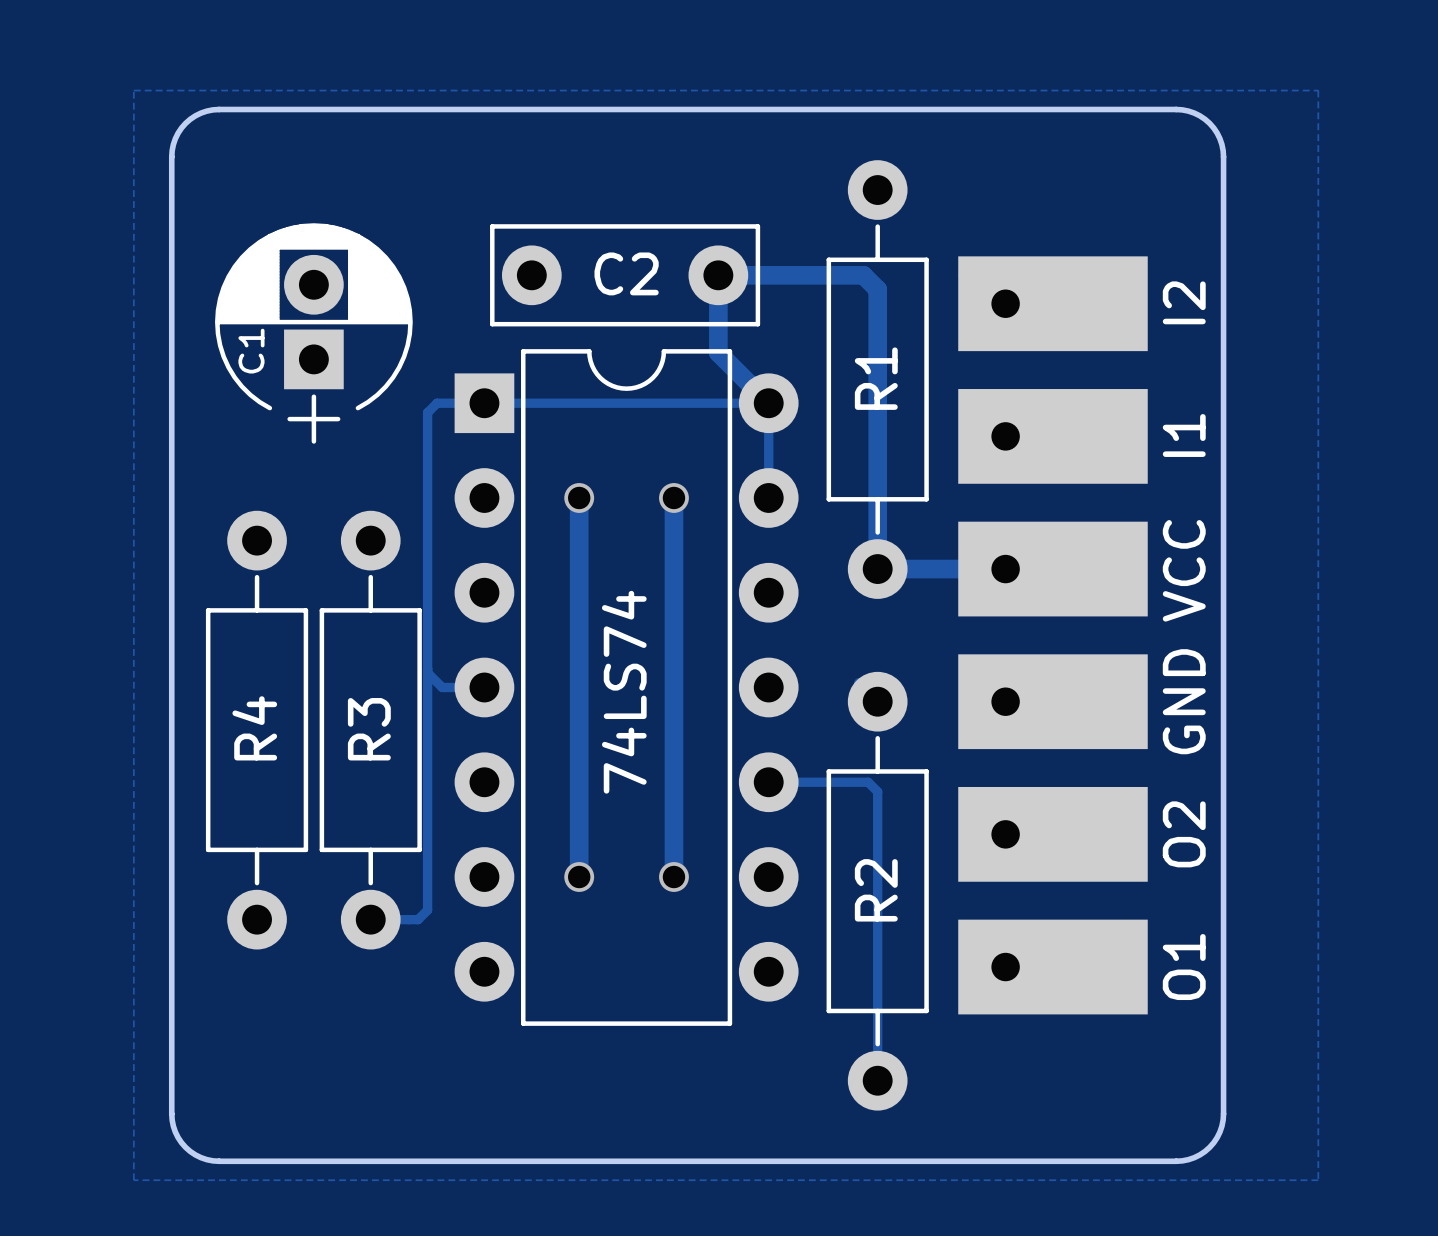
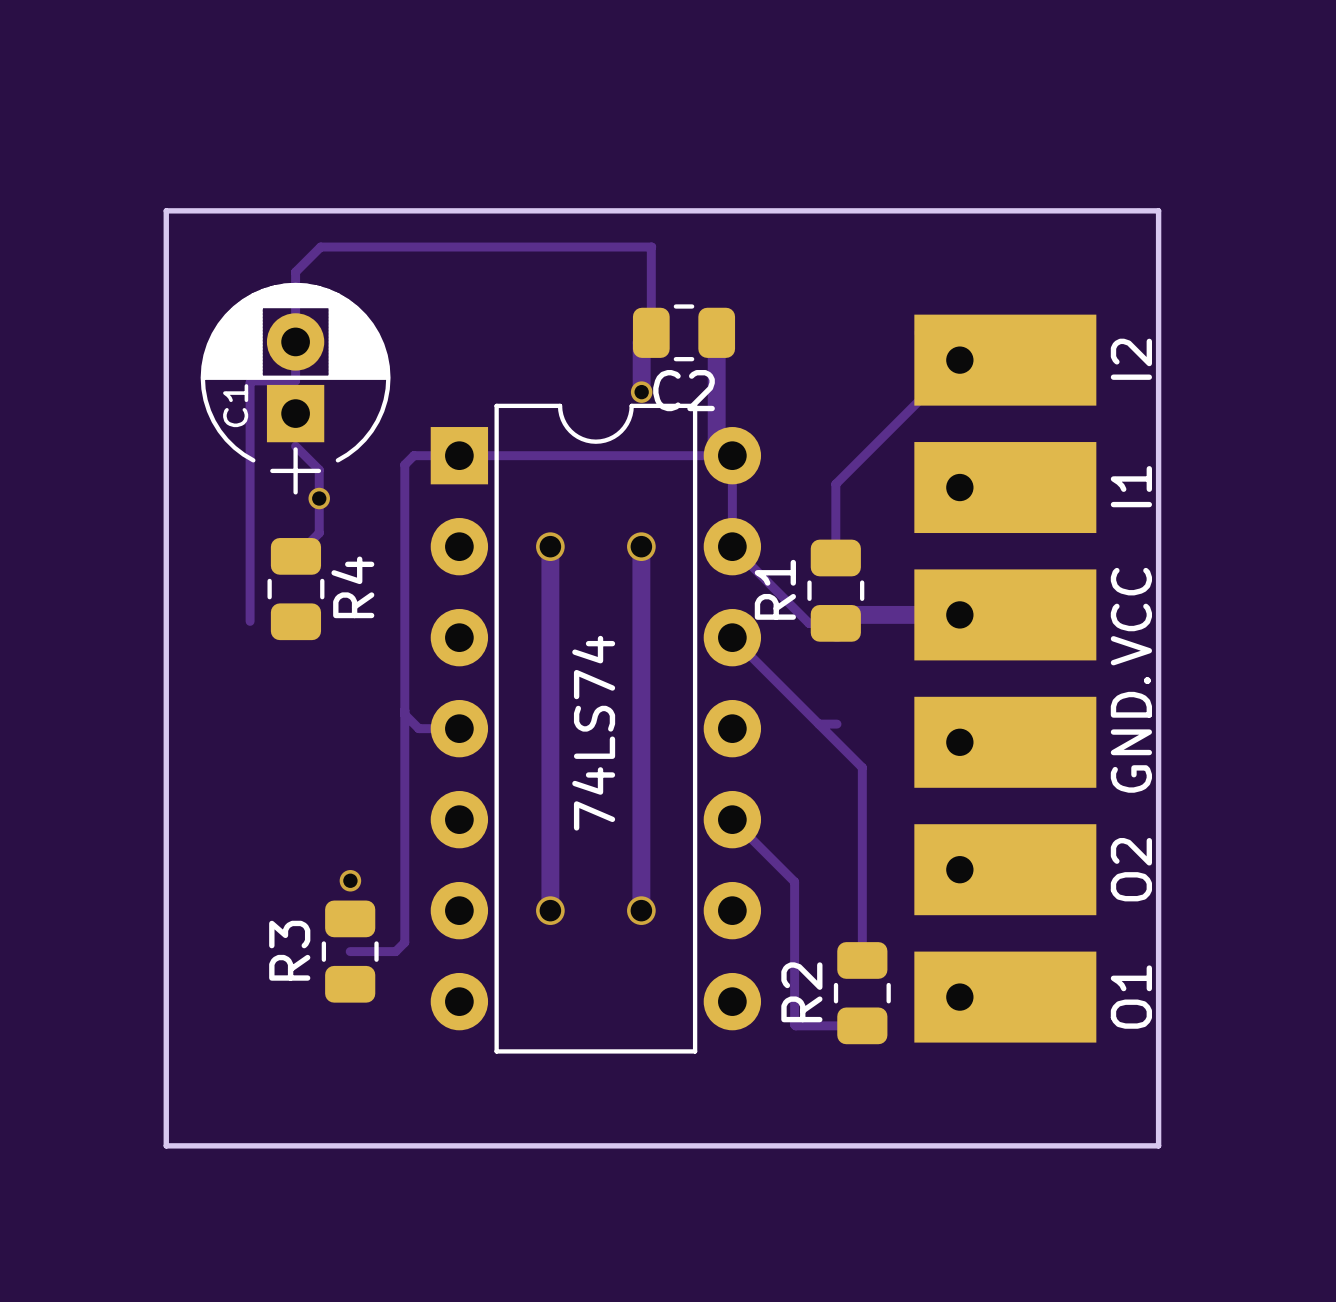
zone outline: (133, 90) (1318, 90) (1318, 1180) (133, 1180) (133, 90) -> none
board edge: (219, 109) (1176, 109) (1194, 113) (1209, 123) (1219, 138) (1223, 156) (1223, 1113) (1219, 1132) (1209, 1147) (1194, 1157) (1176, 1161) (219, 1161) (201, 1157) (185, 1147) (175, 1132) (171, 1113) (171, 156) (175, 138) (185, 123) (201, 113) (219, 109) -> (166, 210) (166, 1145) (1158, 1145) (1158, 210) (166, 210)
R1 footprint: [826, 160, 929, 599] -> [807, 539, 865, 642]
track: none -> (651, 247) (320, 247) (295, 272) (295, 380) (252, 380) (250, 382) (250, 621)
track: none -> (651, 247) (651, 332) (641, 342) (641, 392)
C2 footprint: [490, 224, 761, 327] -> [632, 304, 736, 362]
track: (718, 275) (863, 275) (877, 289) (877, 569) -> none
track: (718, 280) (718, 352) (752, 386) -> (716, 332) (716, 440)
track: none -> (959, 360) (835, 484) (835, 557)
via: none -> (641, 392)
track: none -> (295, 446) (319, 469) (319, 533) (295, 556)
via: none -> (319, 498)
track: none -> (732, 546) (809, 623) (835, 623)
R4 footprint: [205, 510, 309, 950] -> [267, 538, 325, 641]
R3 footprint: [319, 510, 422, 950] -> [321, 900, 379, 1003]
track: none -> (732, 637) (862, 767) (862, 960)
line: none -> (1146, 680) (1147, 680) (1147, 681) (1146, 681) (1146, 680)
R2 footprint: [826, 671, 929, 1111] -> [833, 942, 891, 1045]
track: (768, 782) (868, 782) (877, 791) (877, 1080) -> (732, 819) (794, 881) (794, 1024) (862, 1025)
via: none -> (350, 880)

